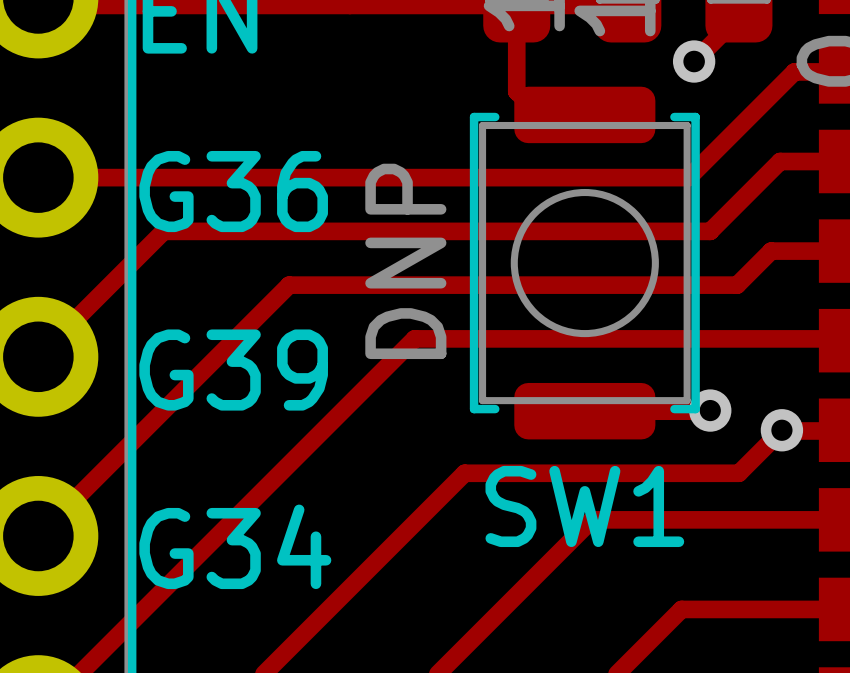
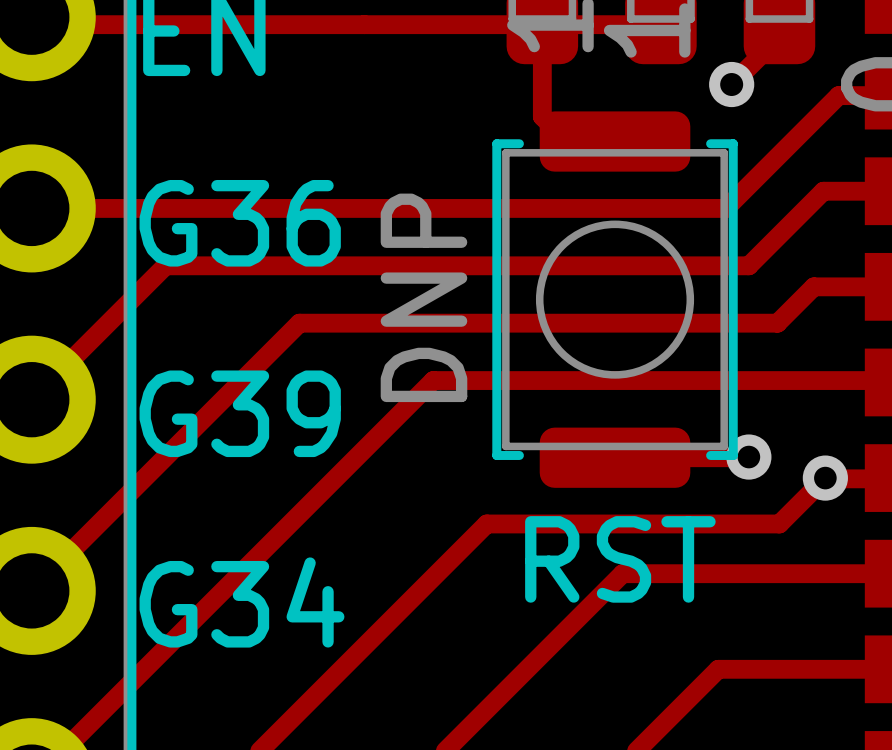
SW1 name: SW1 (584, 506) -> RST (620, 559)

